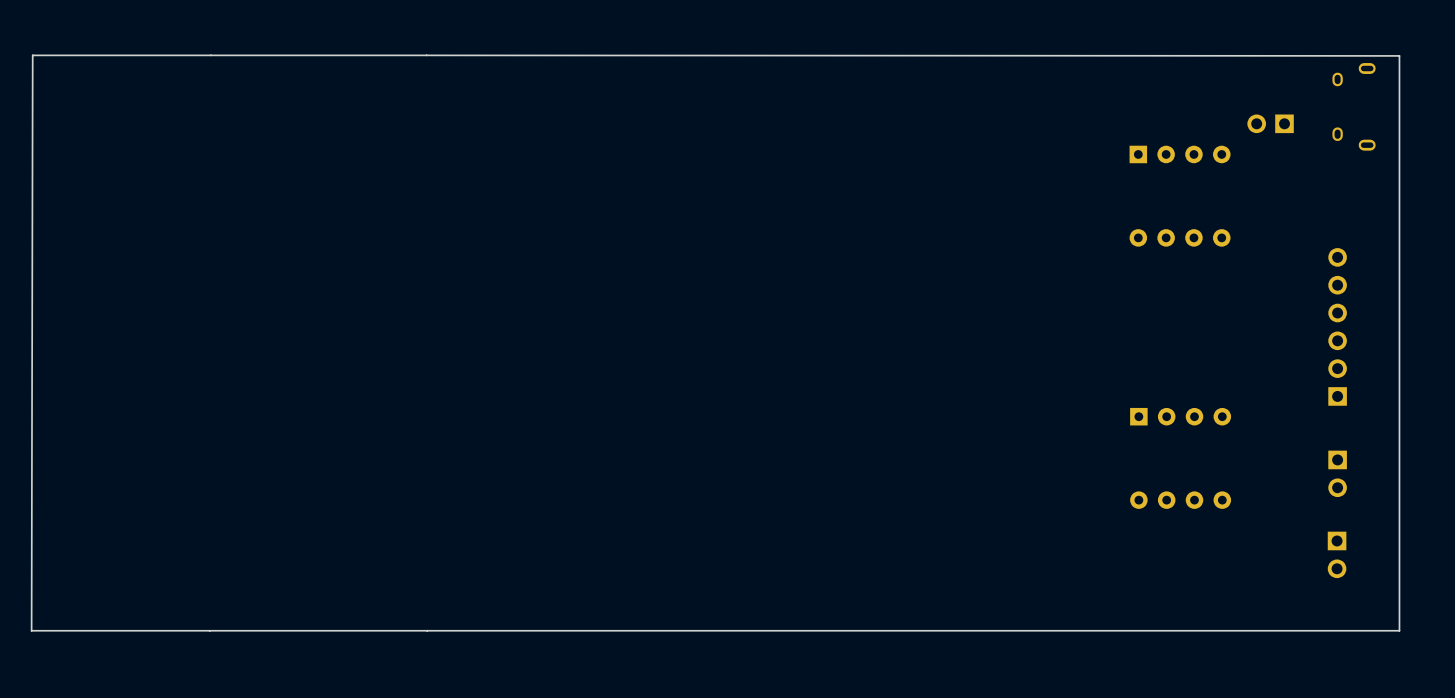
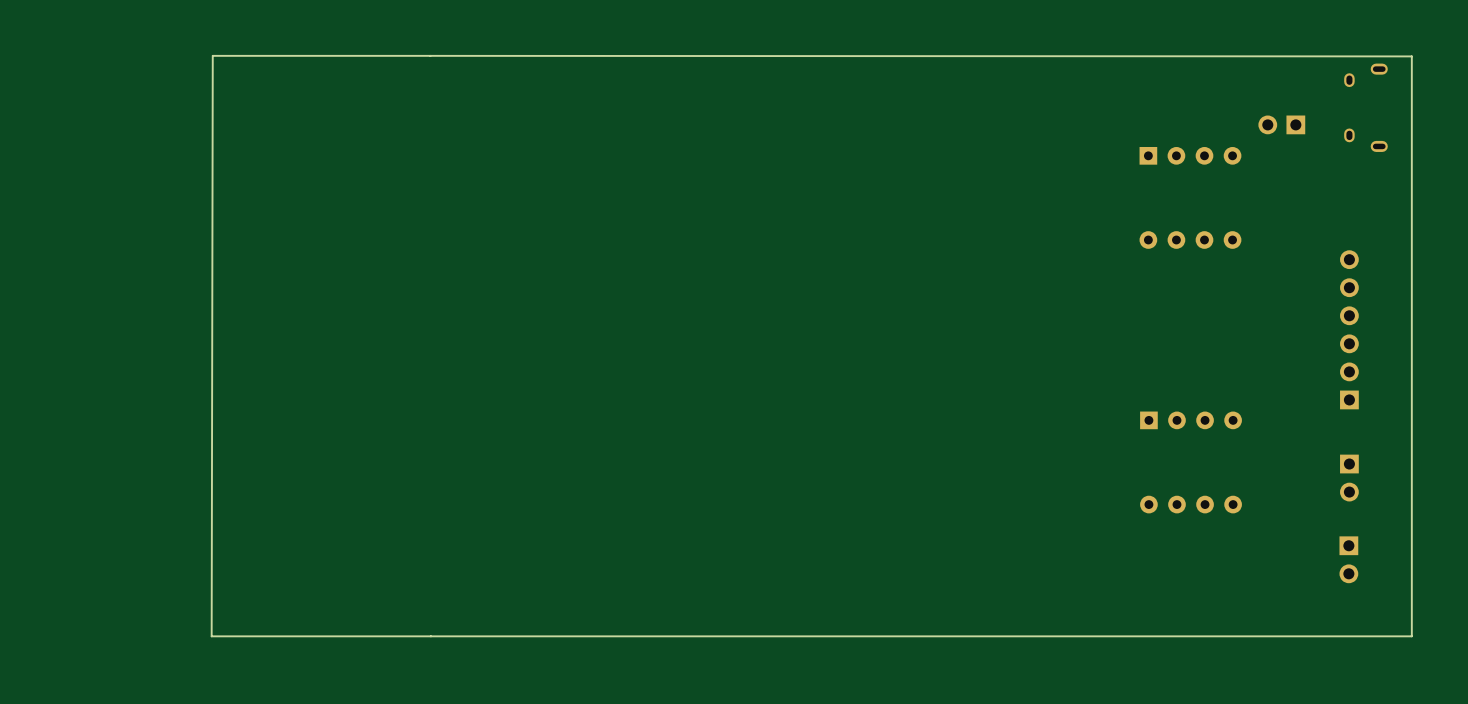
board edge: (210, 55) (32, 55) (31, 630) (209, 630) -> (212, 55) (211, 636)

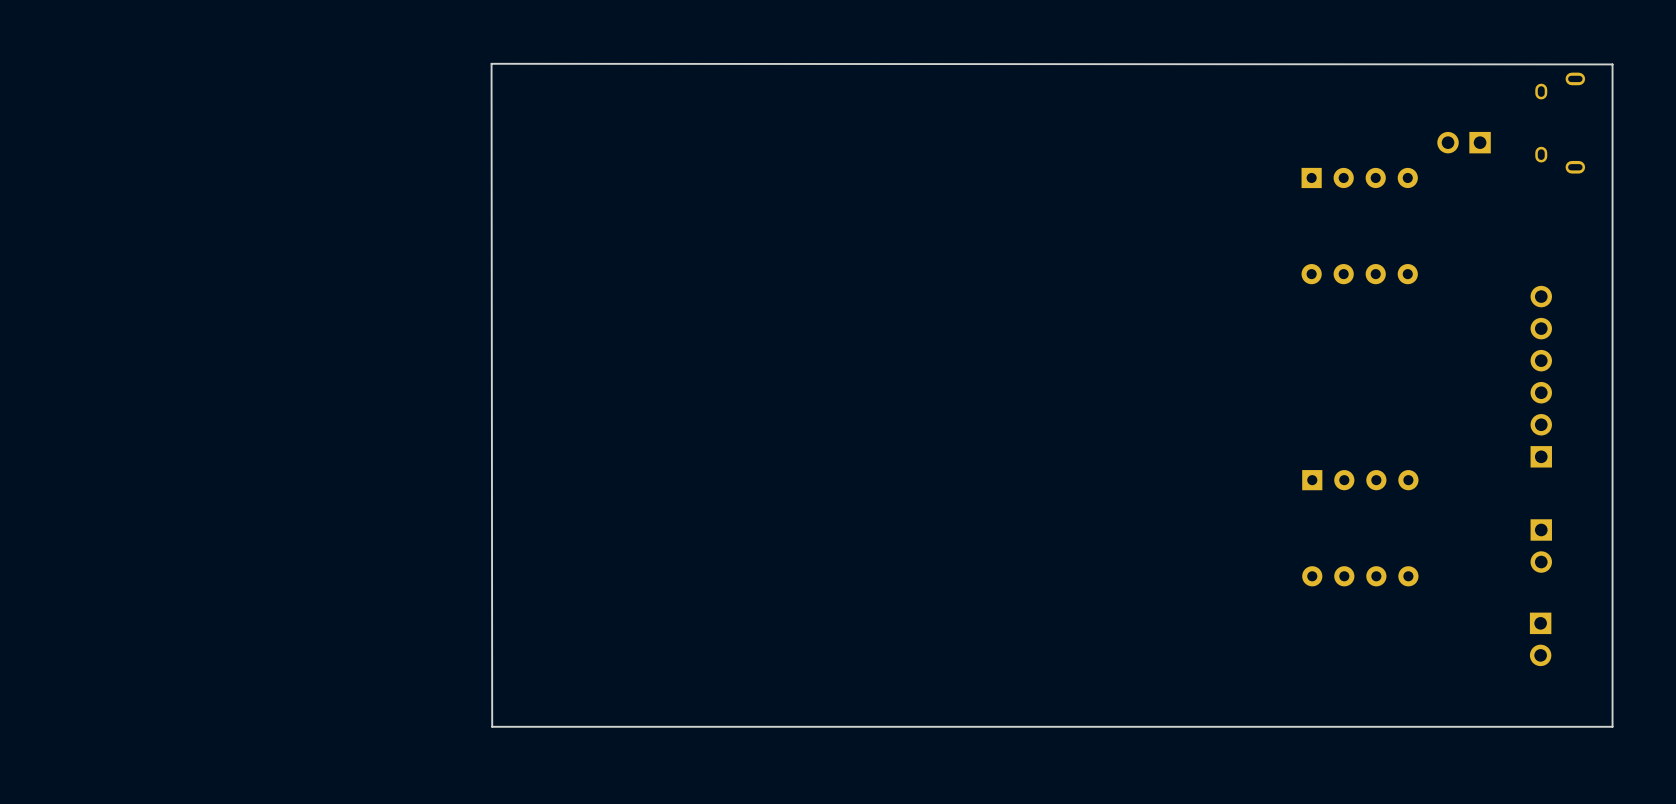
board edge: (430, 55) (212, 55) (211, 636) (430, 636) -> (491, 63) (492, 726)

